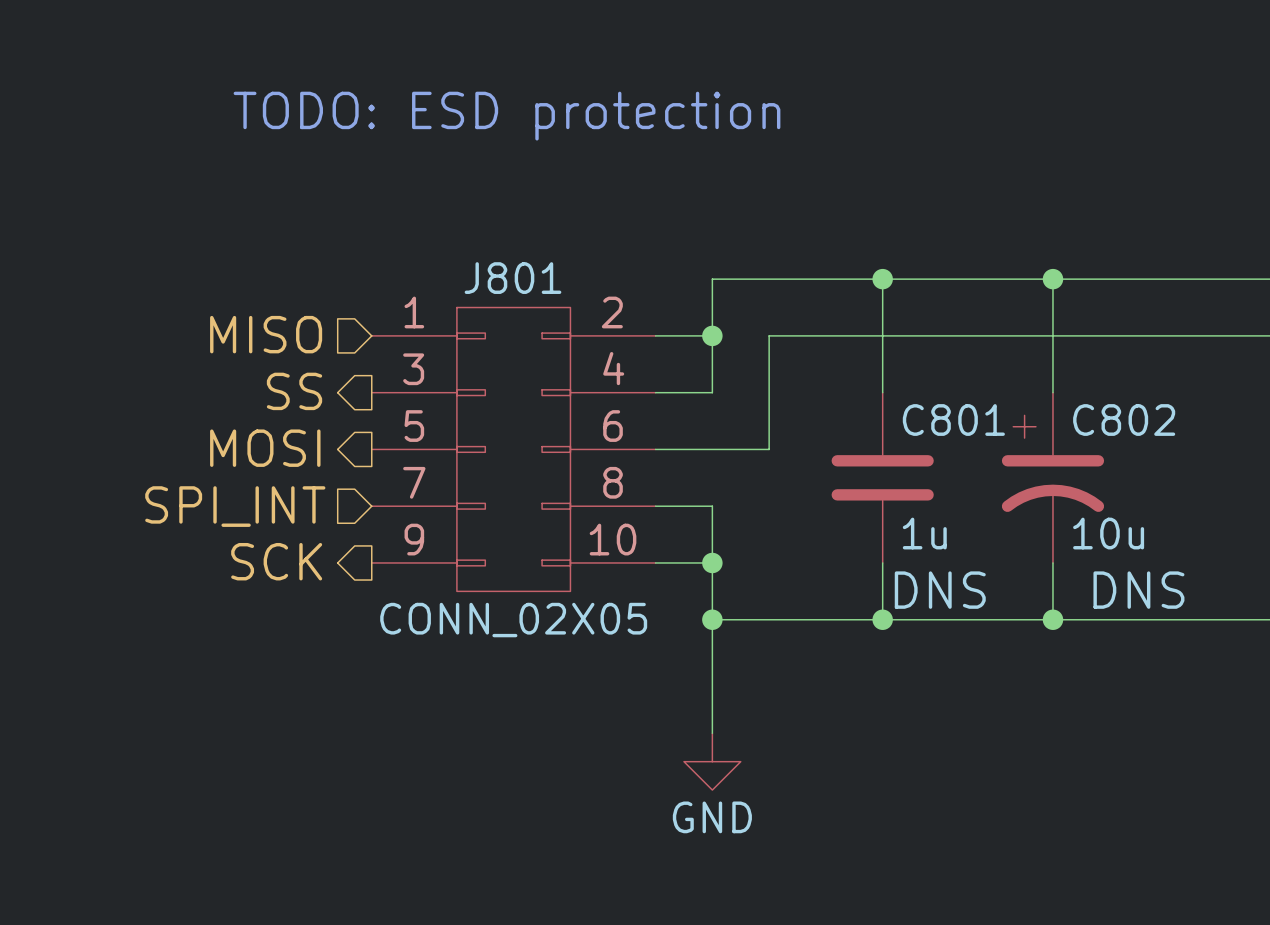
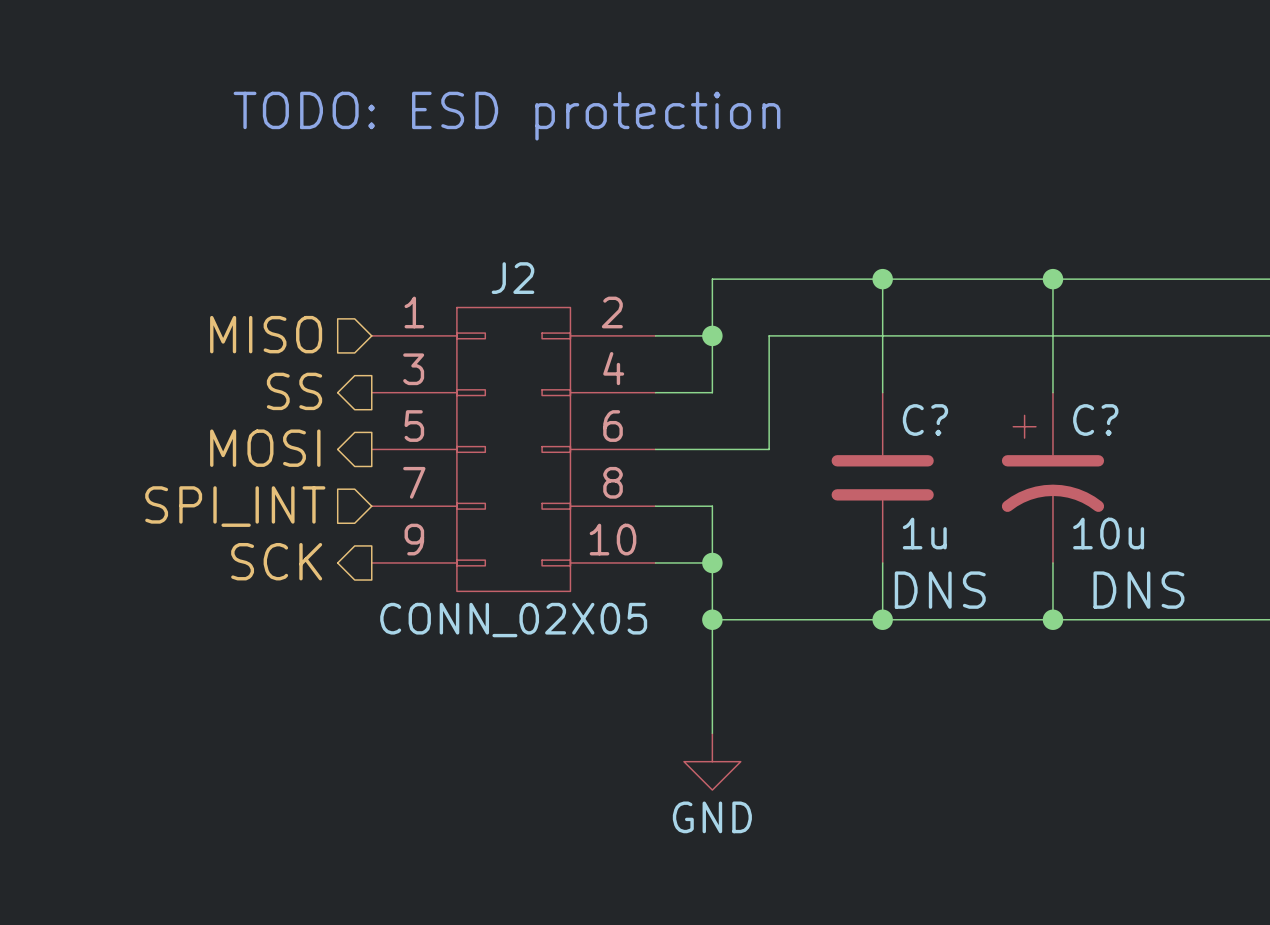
J801 name: J801 (513, 278) -> J2 (513, 278)
C801 name: C801 (953, 420) -> C? (925, 420)
C802 name: C802 (1124, 420) -> C? (1095, 420)

